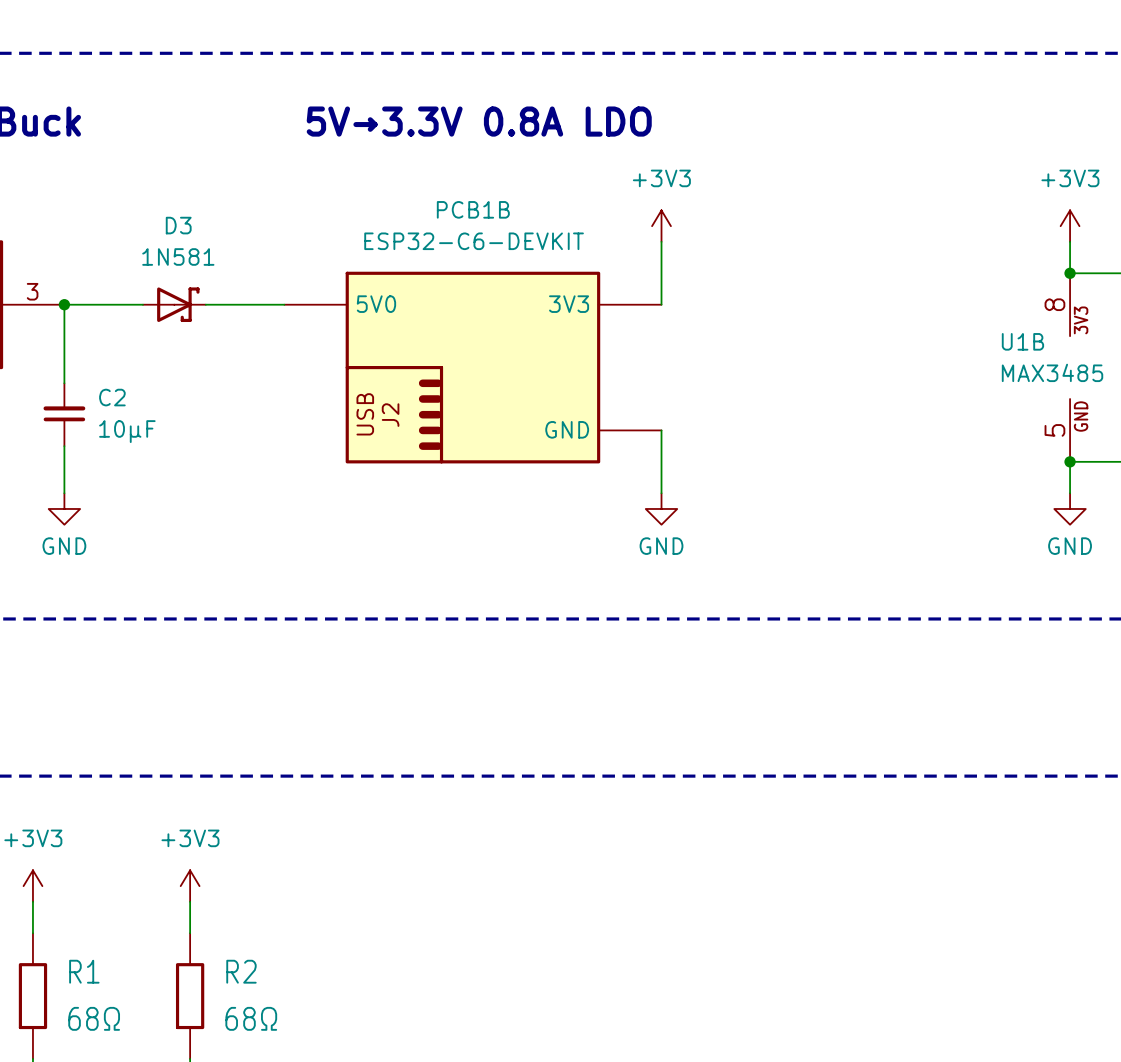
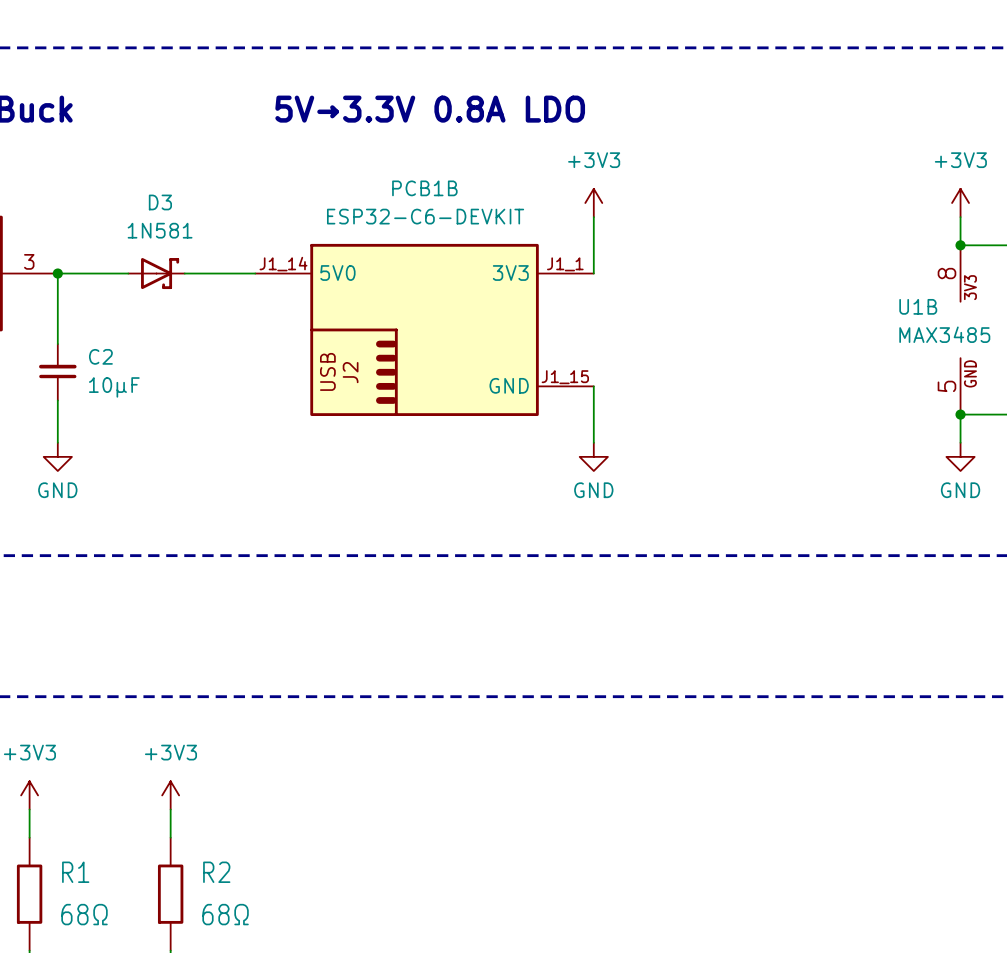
PCB1B pin number: none -> J1_14 (283, 264)
PCB1B pin number: none -> J1_1 (565, 264)
PCB1B pin number: none -> J1_15 (565, 377)

